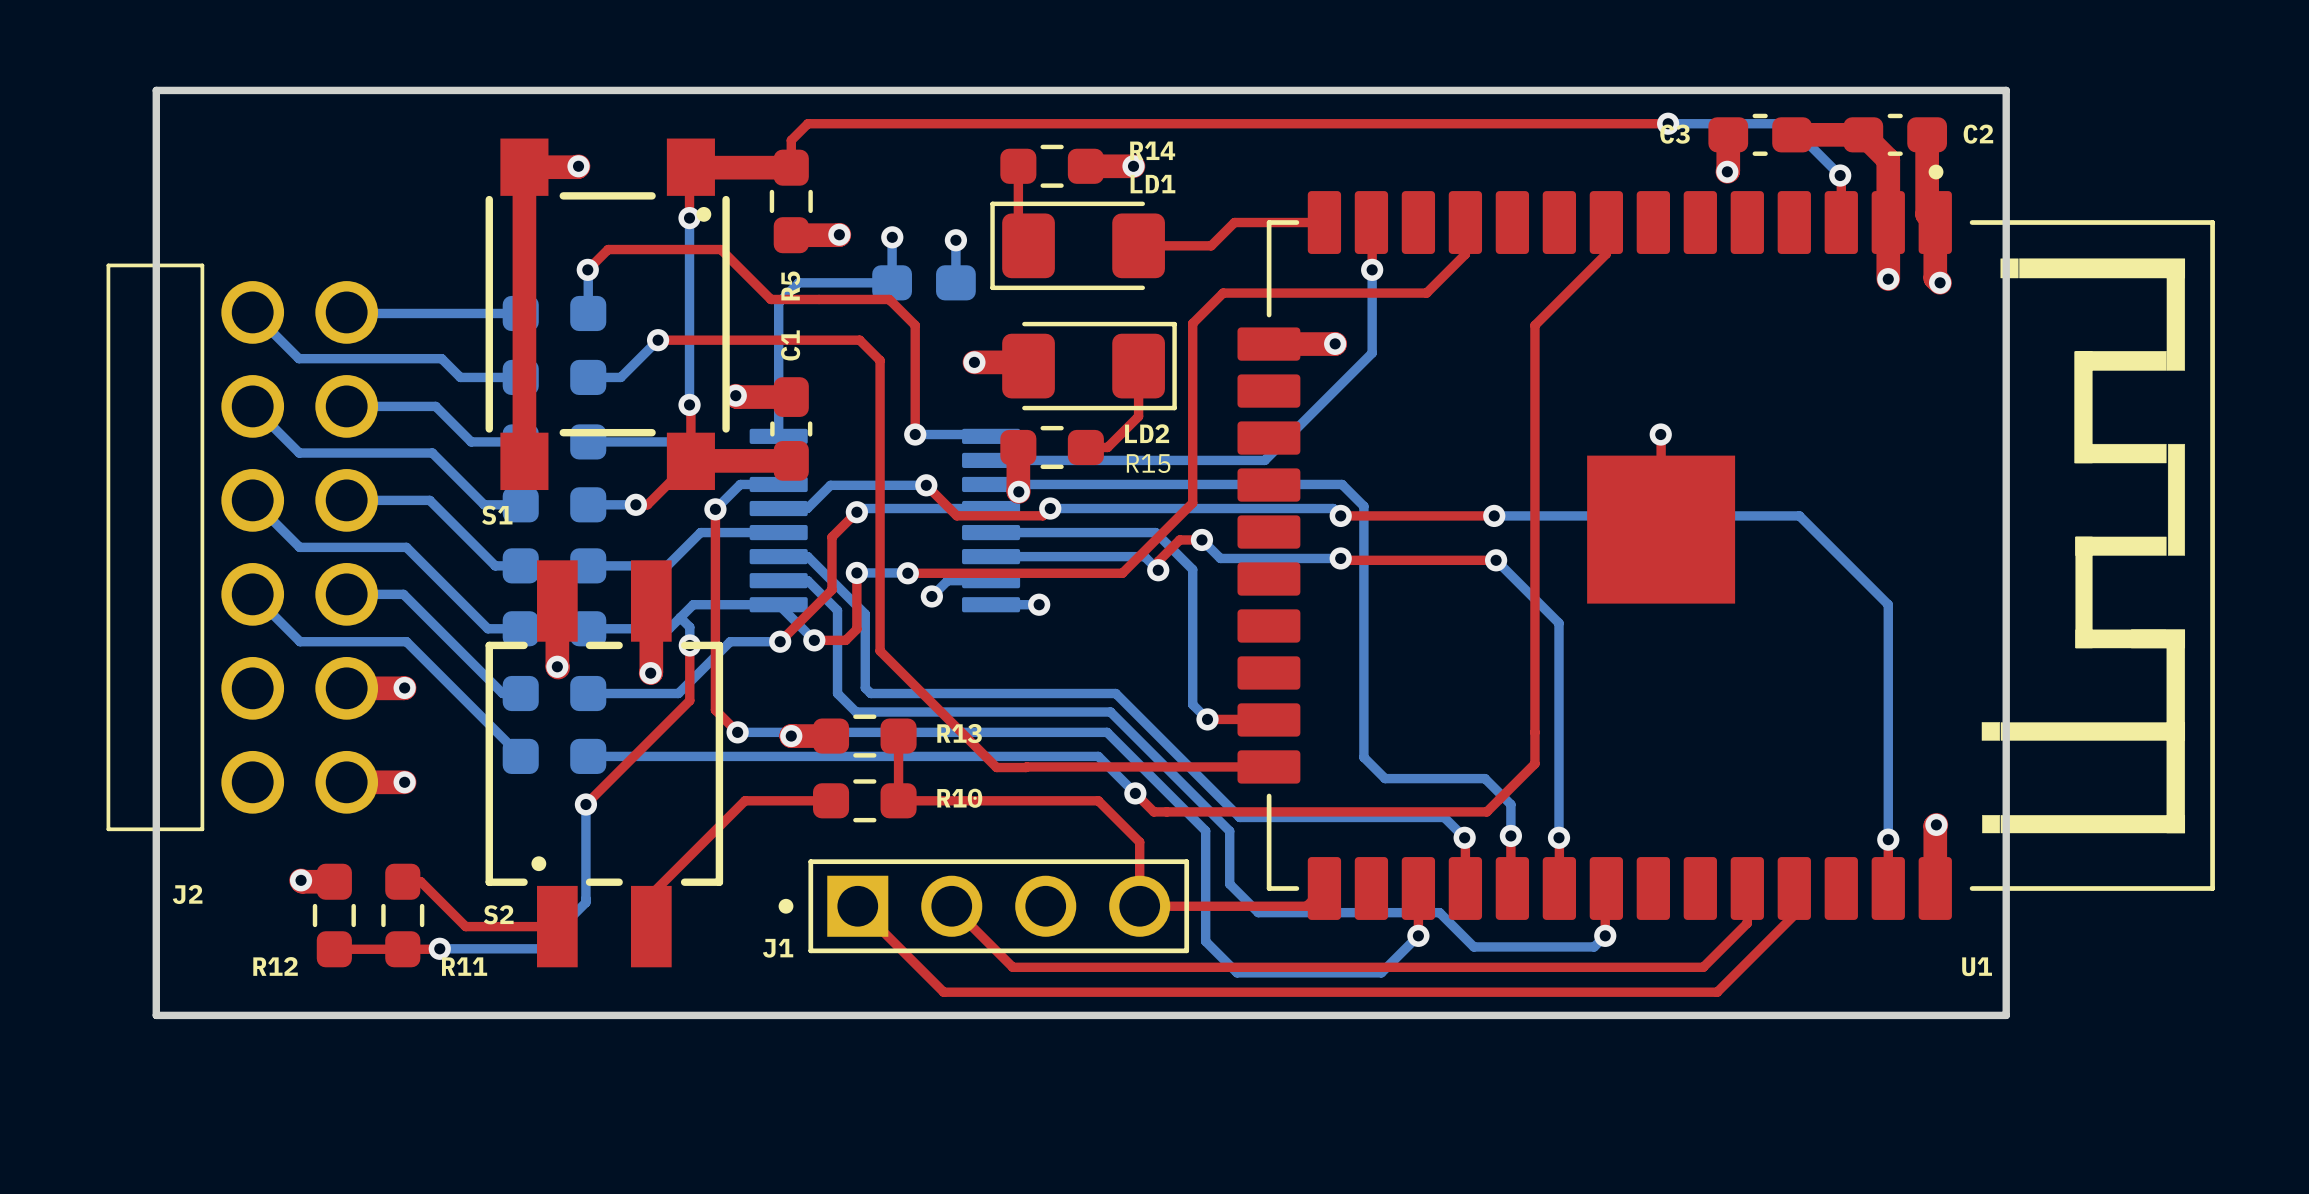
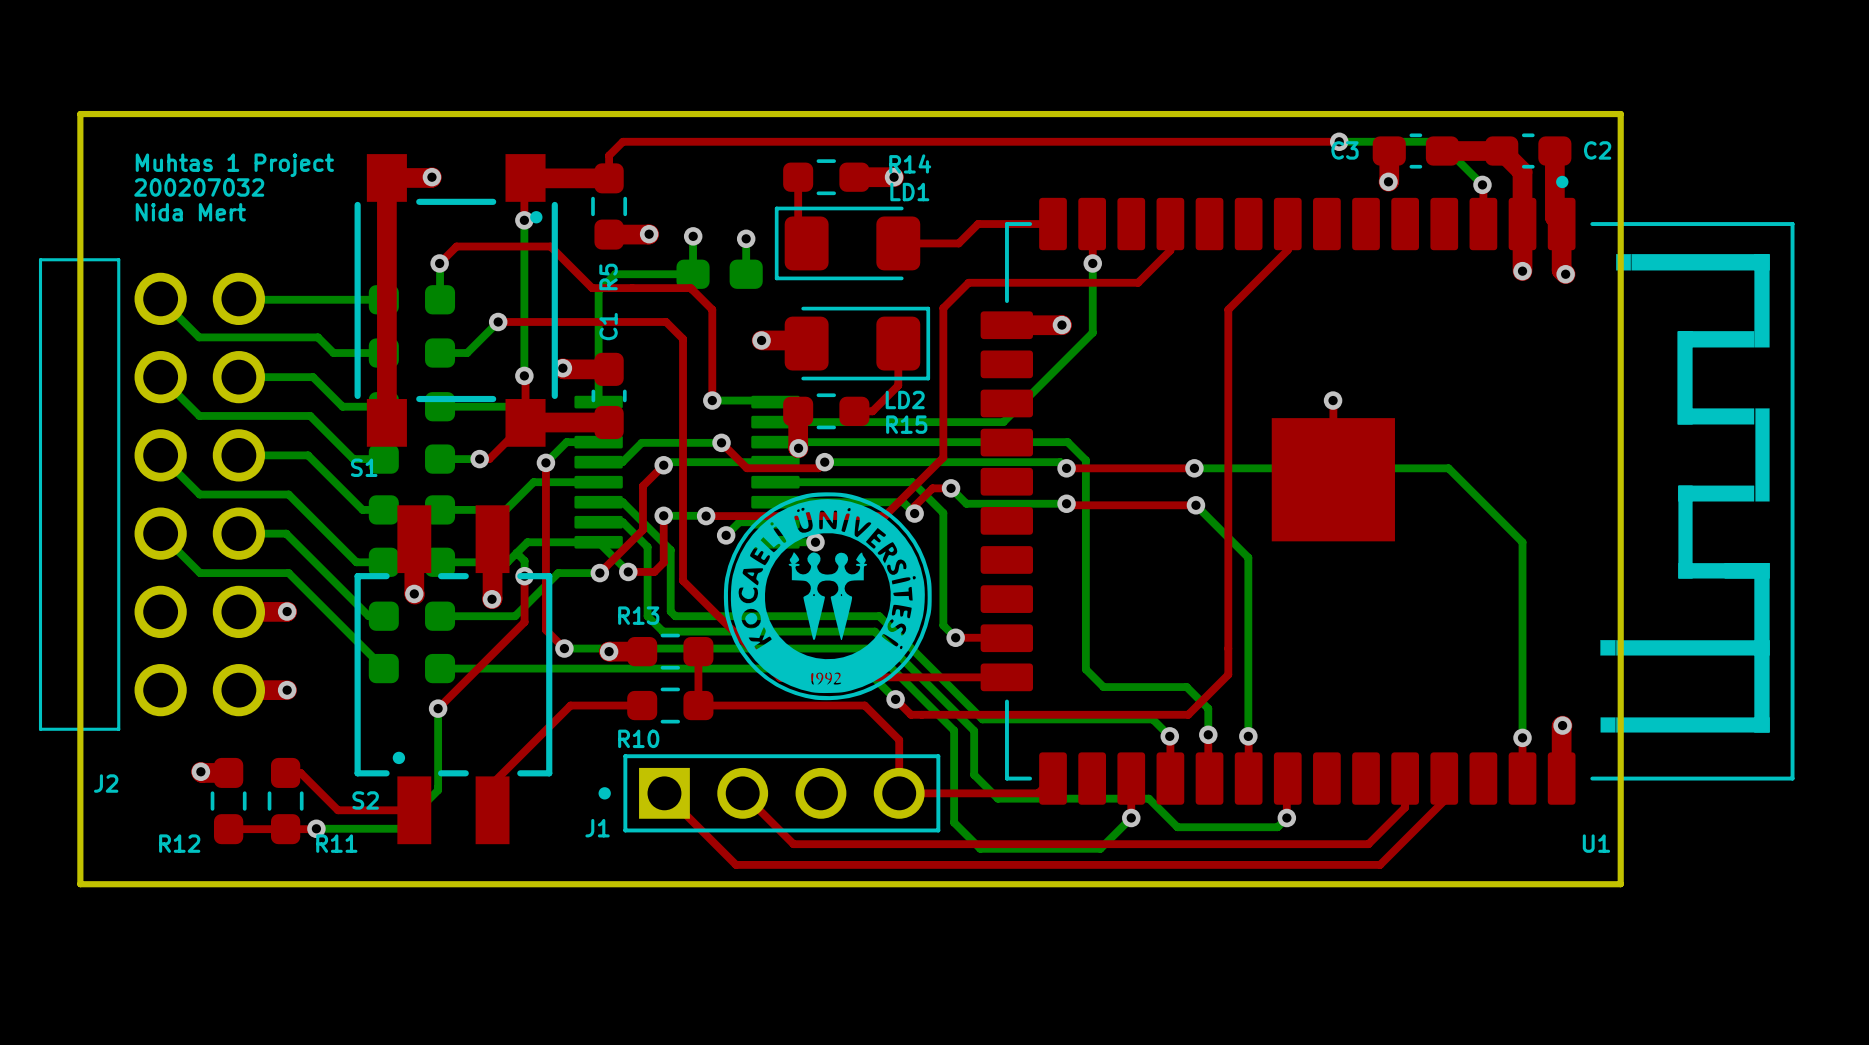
text: none -> Muhtas 1 Project (234, 165)
text: none -> 200207032 (199, 187)
text: none -> Nida Mert (190, 212)
drawing: none -> [723, 492, 932, 701]
R13 name position: R13 (959, 733) -> R13 (638, 615)
R10 name position: R10 (959, 798) -> R10 (638, 738)

